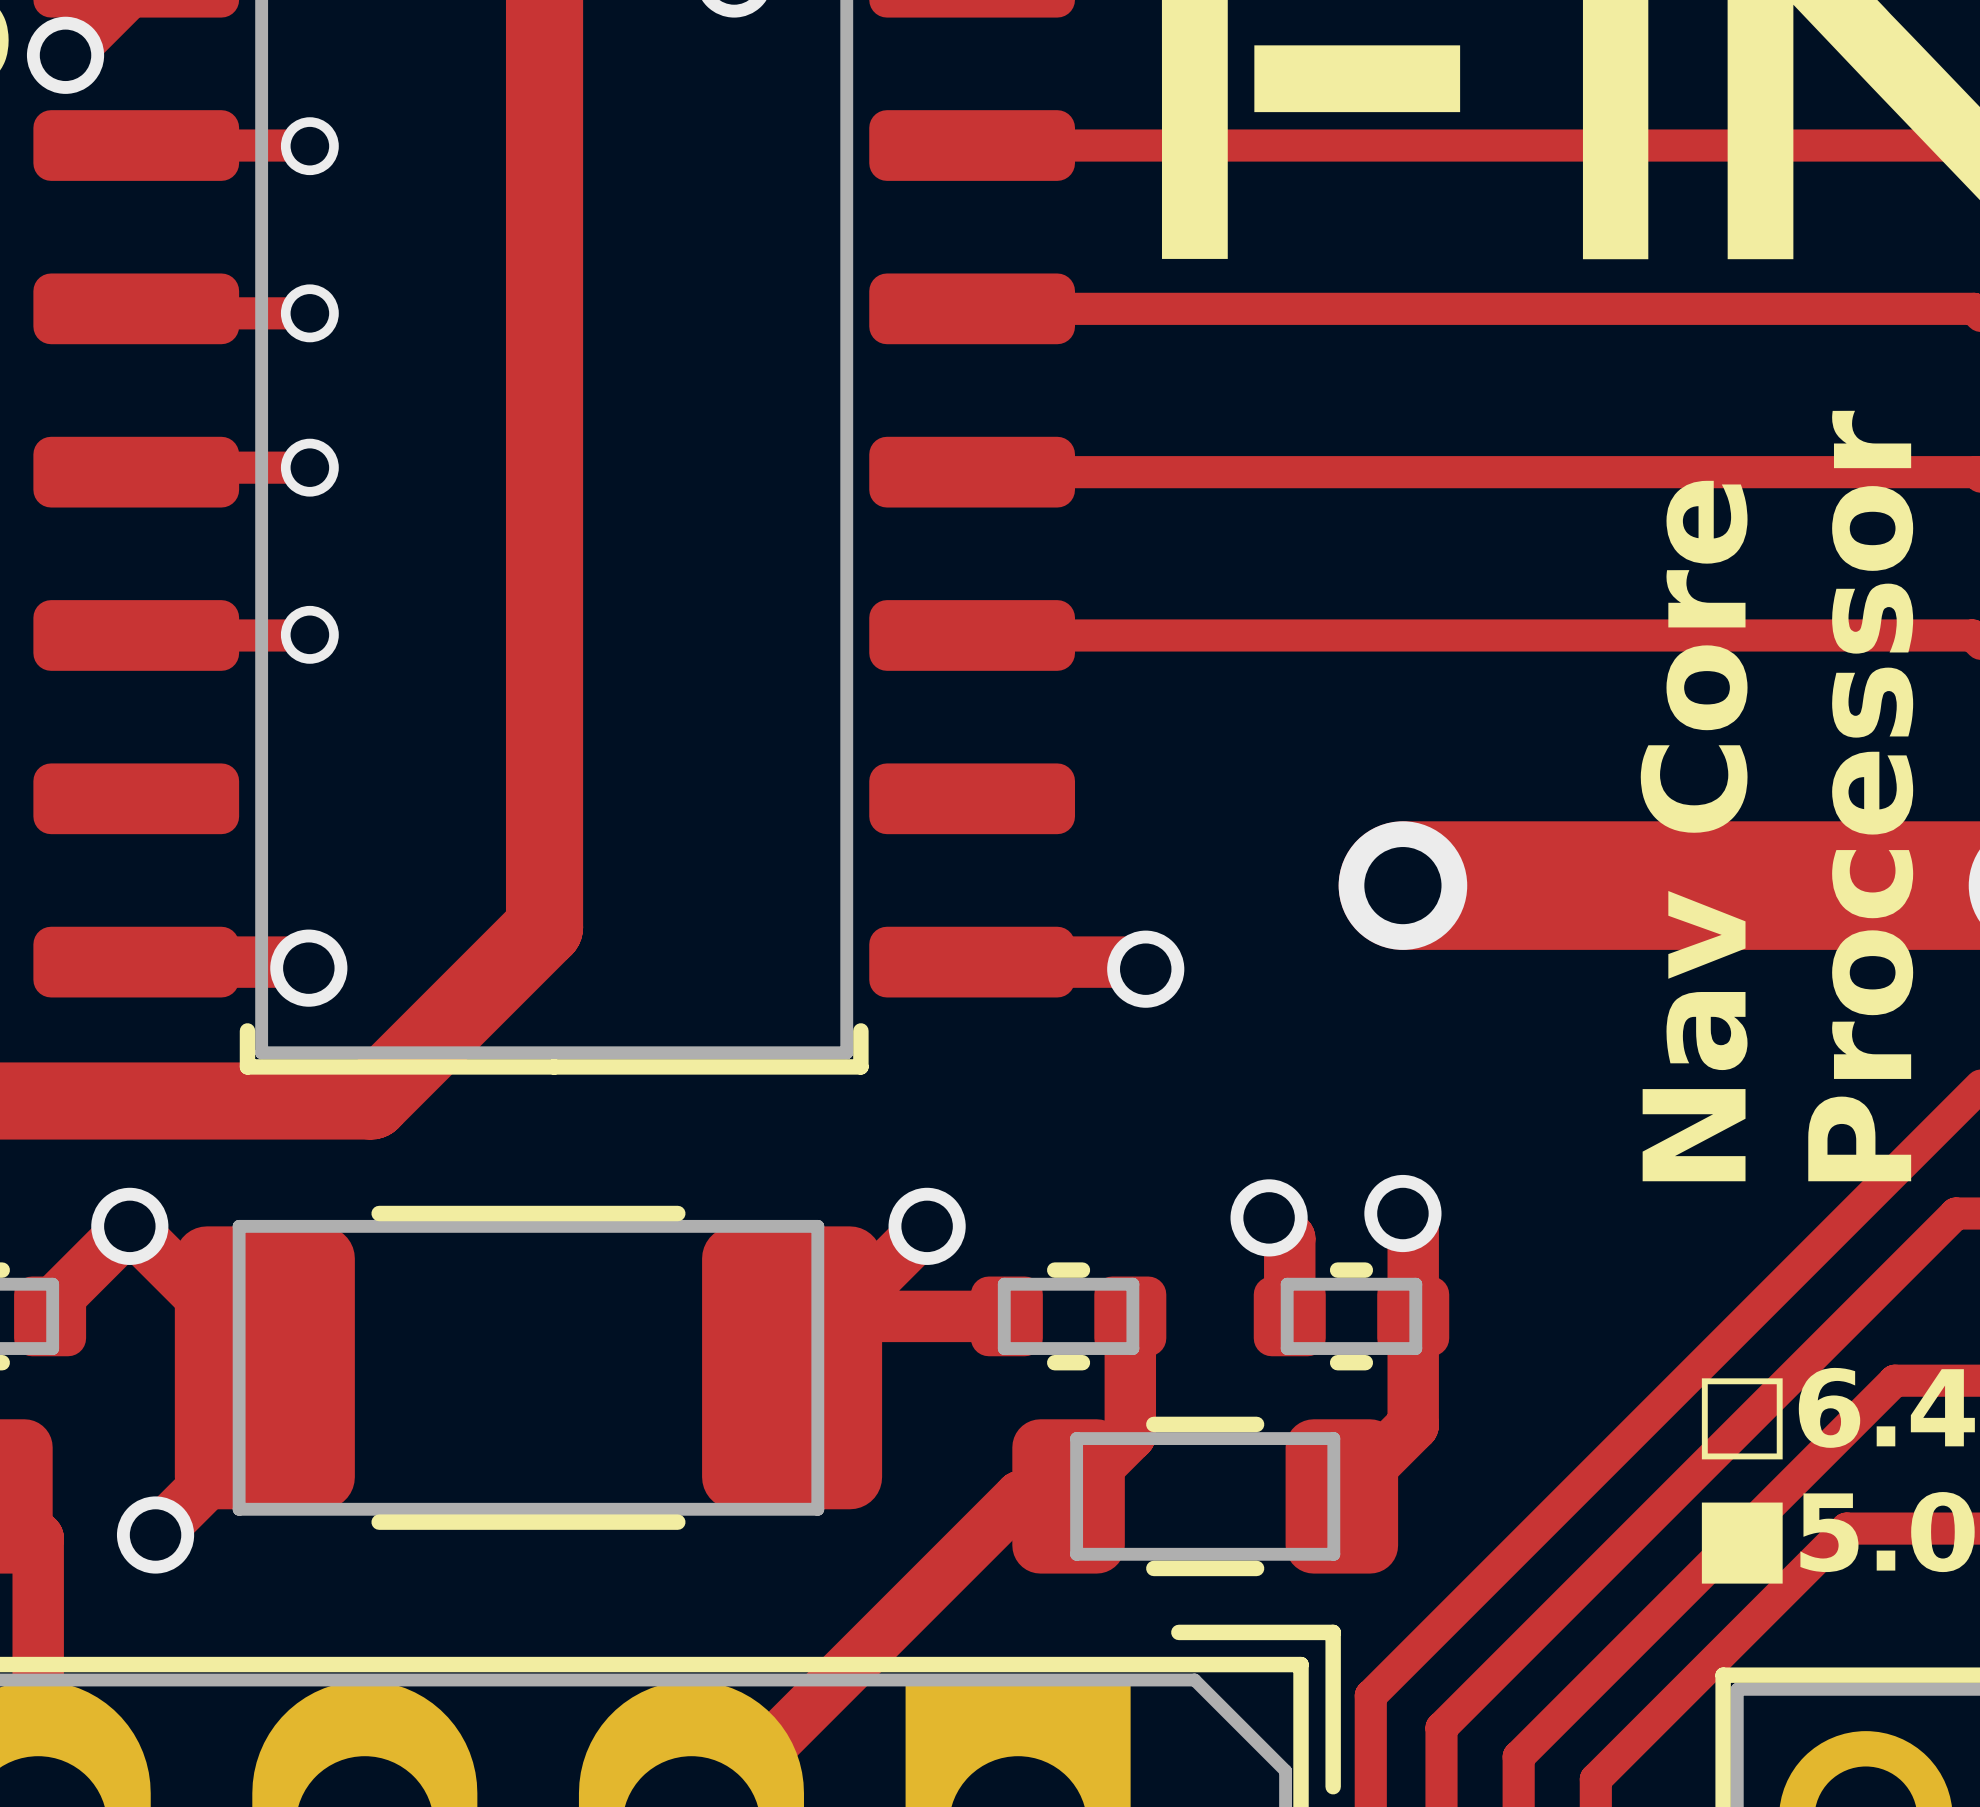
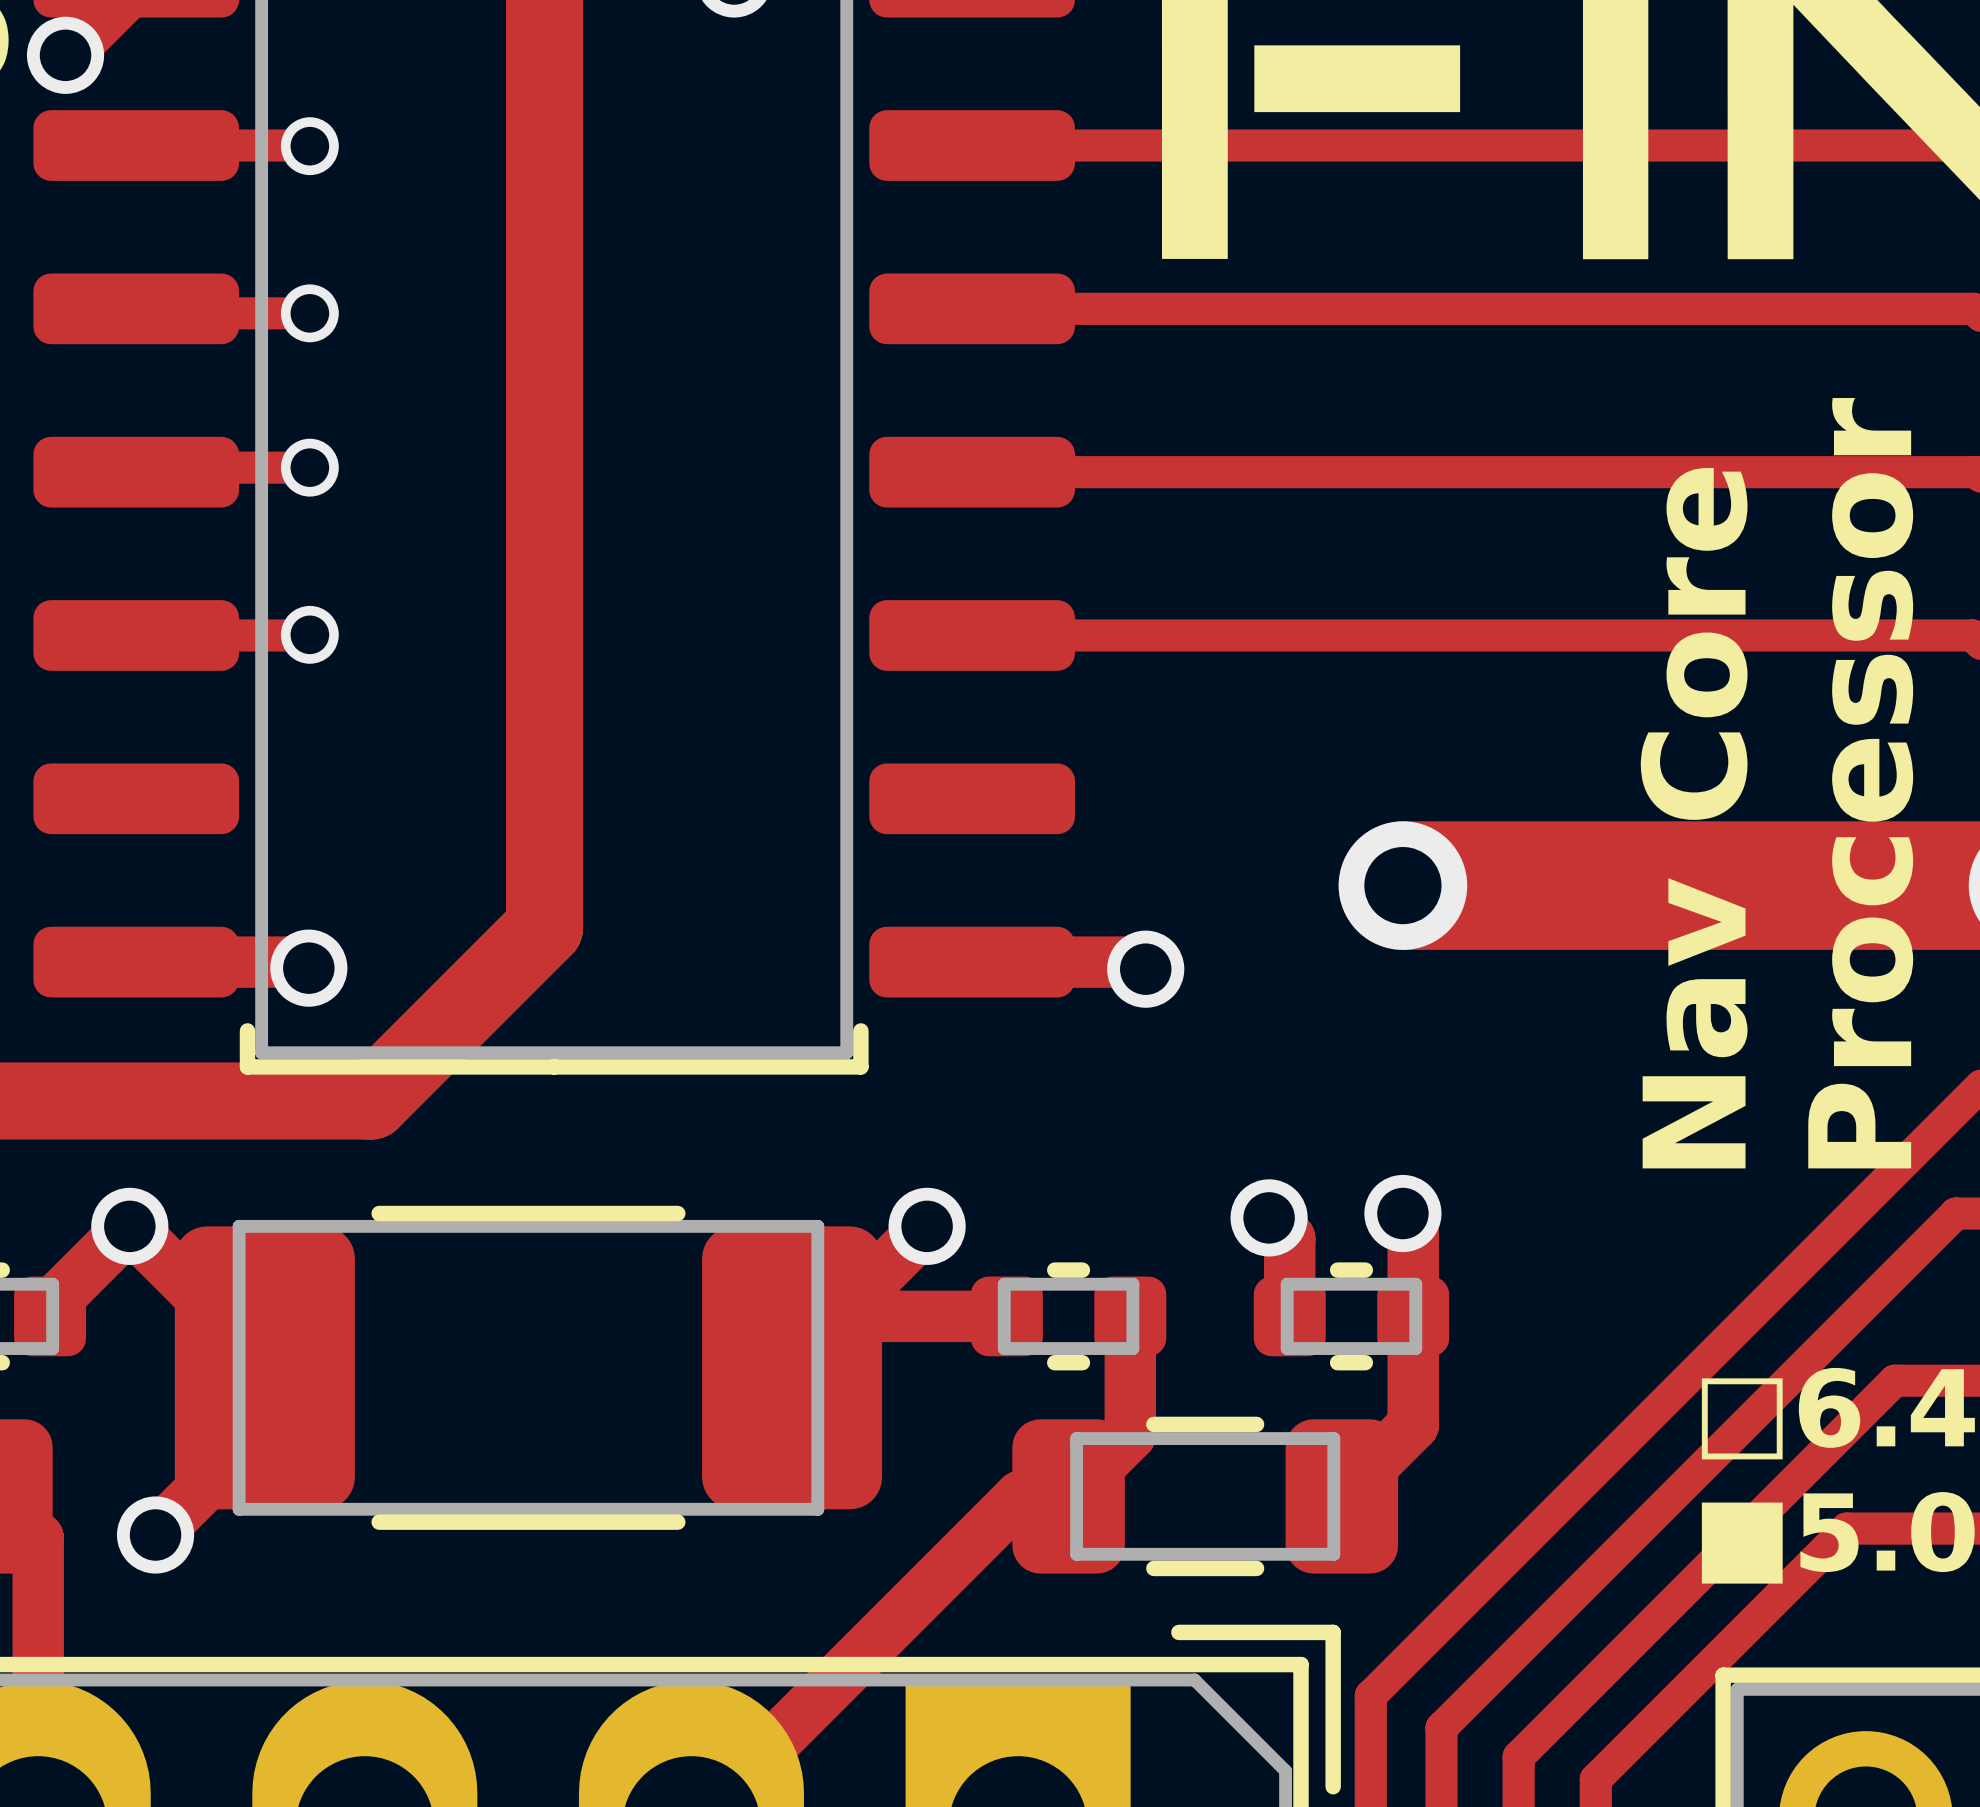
text position: Processor (1860, 796) -> Processor (1860, 783)
text position: Nav Core (1694, 831) -> Nav Core (1694, 818)

